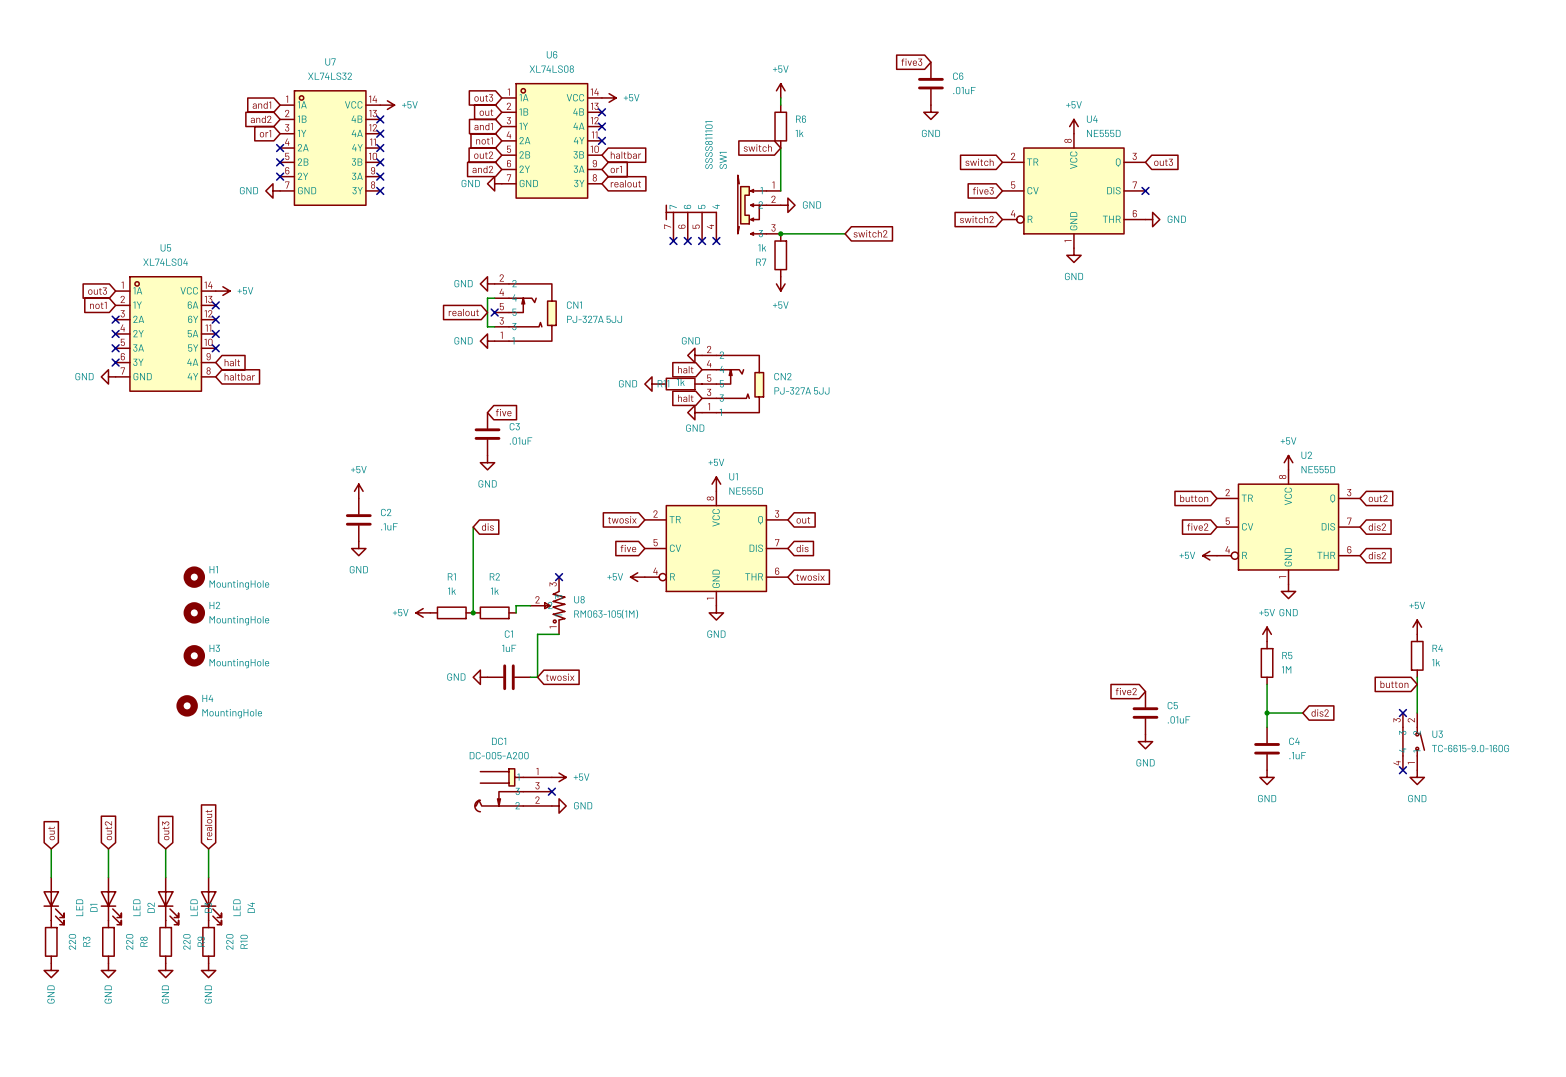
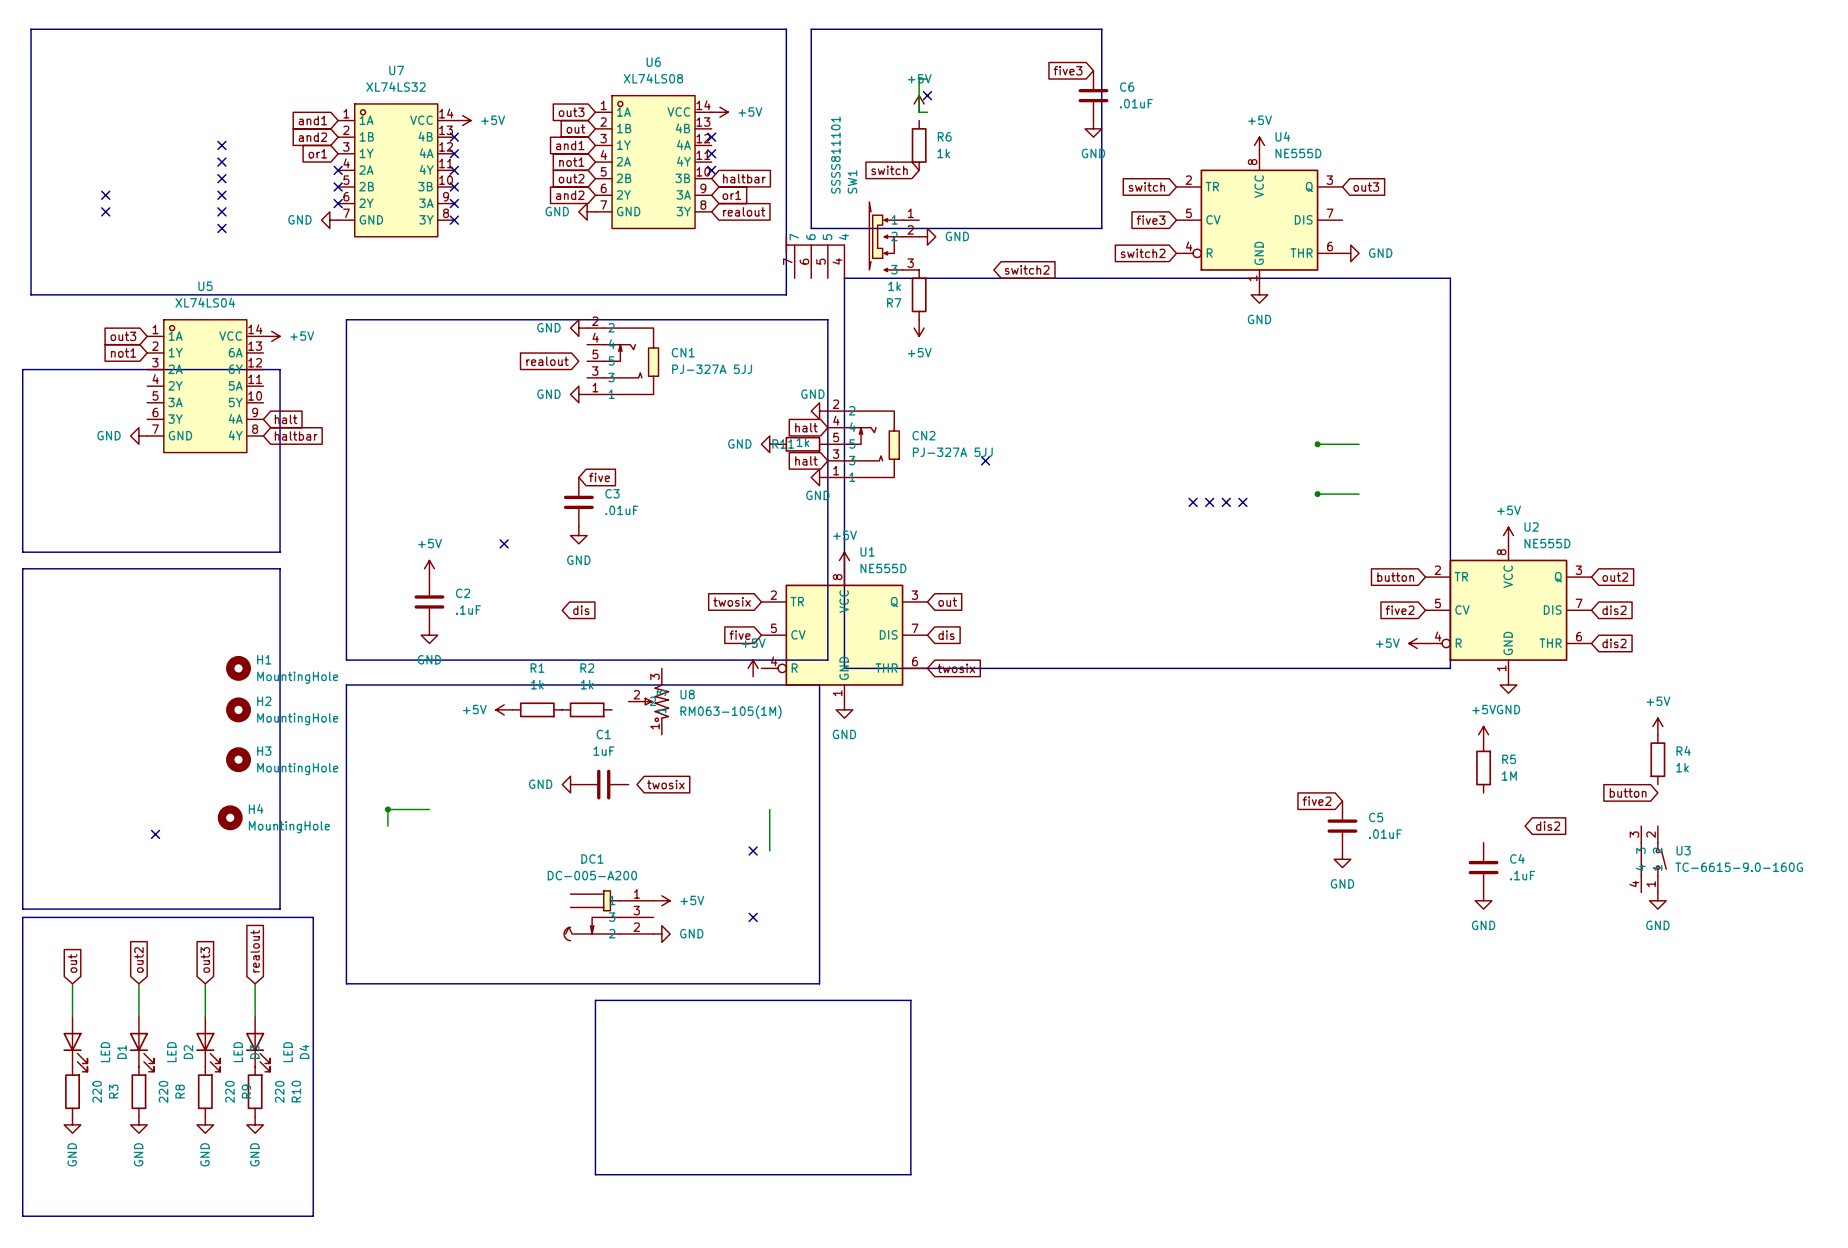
line: none -> (31, 29) (786, 29) (786, 294) (31, 294) (31, 29)
line: none -> (811, 29) (1101, 29) (1101, 228) (811, 228) (811, 29)
wire: none -> (927, 79) (919, 79) (919, 112) (927, 112)
no-connect mark: none -> (927, 95)
wire: (780, 97) (780, 105) -> none
no-connect mark: (601, 112) -> none
no-connect mark: none -> (711, 137)
no-connect mark: none -> (221, 145)
no-connect mark: (601, 126) -> none
no-connect mark: none -> (711, 153)
no-connect mark: none -> (221, 162)
no-connect mark: (601, 140) -> none
no-connect mark: none -> (711, 170)
wire: (780, 148) (780, 190) -> none
no-connect mark: none -> (221, 178)
no-connect mark: none -> (105, 195)
no-connect mark: none -> (221, 195)
no-connect mark: none -> (105, 211)
no-connect mark: none -> (221, 211)
no-connect mark: (1145, 190) -> none
no-connect mark: none -> (221, 228)
wire: (780, 233) (845, 233) -> none
junction: (780, 233) -> none
no-connect mark: (673, 241) -> none
no-connect mark: (687, 241) -> none
no-connect mark: (702, 241) -> none
line: none -> (844, 278) (1450, 278) (1450, 668) (844, 668) (844, 278)
no-connect mark: (716, 241) -> none
line: none -> (346, 319) (827, 319) (827, 660) (346, 660) (346, 319)
wire: (494, 298) (487, 298) (487, 326) (494, 326) -> none
no-connect mark: (215, 305) -> none
no-connect mark: (494, 312) -> none
line: none -> (22, 369) (280, 369) (280, 552) (22, 552) (22, 369)
no-connect mark: (115, 319) -> none
no-connect mark: (215, 319) -> none
no-connect mark: (115, 333) -> none
no-connect mark: (215, 333) -> none
no-connect mark: (115, 348) -> none
no-connect mark: (215, 348) -> none
no-connect mark: (115, 362) -> none
wire: none -> (1317, 444) (1359, 444)
junction: none -> (1317, 444)
no-connect mark: none -> (985, 460)
wire: none -> (1317, 494) (1359, 494)
junction: none -> (1317, 494)
no-connect mark: none -> (1193, 502)
no-connect mark: none -> (1209, 502)
no-connect mark: none -> (1226, 502)
no-connect mark: none -> (1242, 502)
no-connect mark: none -> (504, 543)
line: none -> (22, 568) (22, 909) (280, 909) (280, 568) (22, 568)
wire: (473, 527) (473, 612) -> none
no-connect mark: (559, 577) -> none
power symbol rotation: 0° (637, 577) -> 90° clockwise (753, 668)
line: none -> (346, 684) (346, 983) (819, 983) (819, 684) (346, 684)
wire: (530, 605) (516, 605) (516, 612) -> none
junction: (473, 612) -> none
wire: (559, 634) (537, 634) (537, 677) (530, 677) -> none
wire: (1417, 677) (1417, 713) -> none
wire: (1267, 684) (1267, 727) -> none
junction: none -> (387, 809)
wire: none -> (429, 809) (387, 809) (387, 826)
wire: none -> (769, 809) (769, 851)
wire: (1267, 713) (1302, 713) -> none
junction: (1267, 713) -> none
no-connect mark: (1402, 713) -> none
no-connect mark: none -> (155, 834)
no-connect mark: none -> (753, 851)
no-connect mark: (1402, 770) -> none
line: none -> (22, 917) (22, 1216) (313, 1216) (313, 917) (22, 917)
no-connect mark: (551, 791) -> none
no-connect mark: none -> (753, 917)
line: none -> (595, 1000) (910, 1000) (910, 1174) (595, 1174) (595, 1000)

